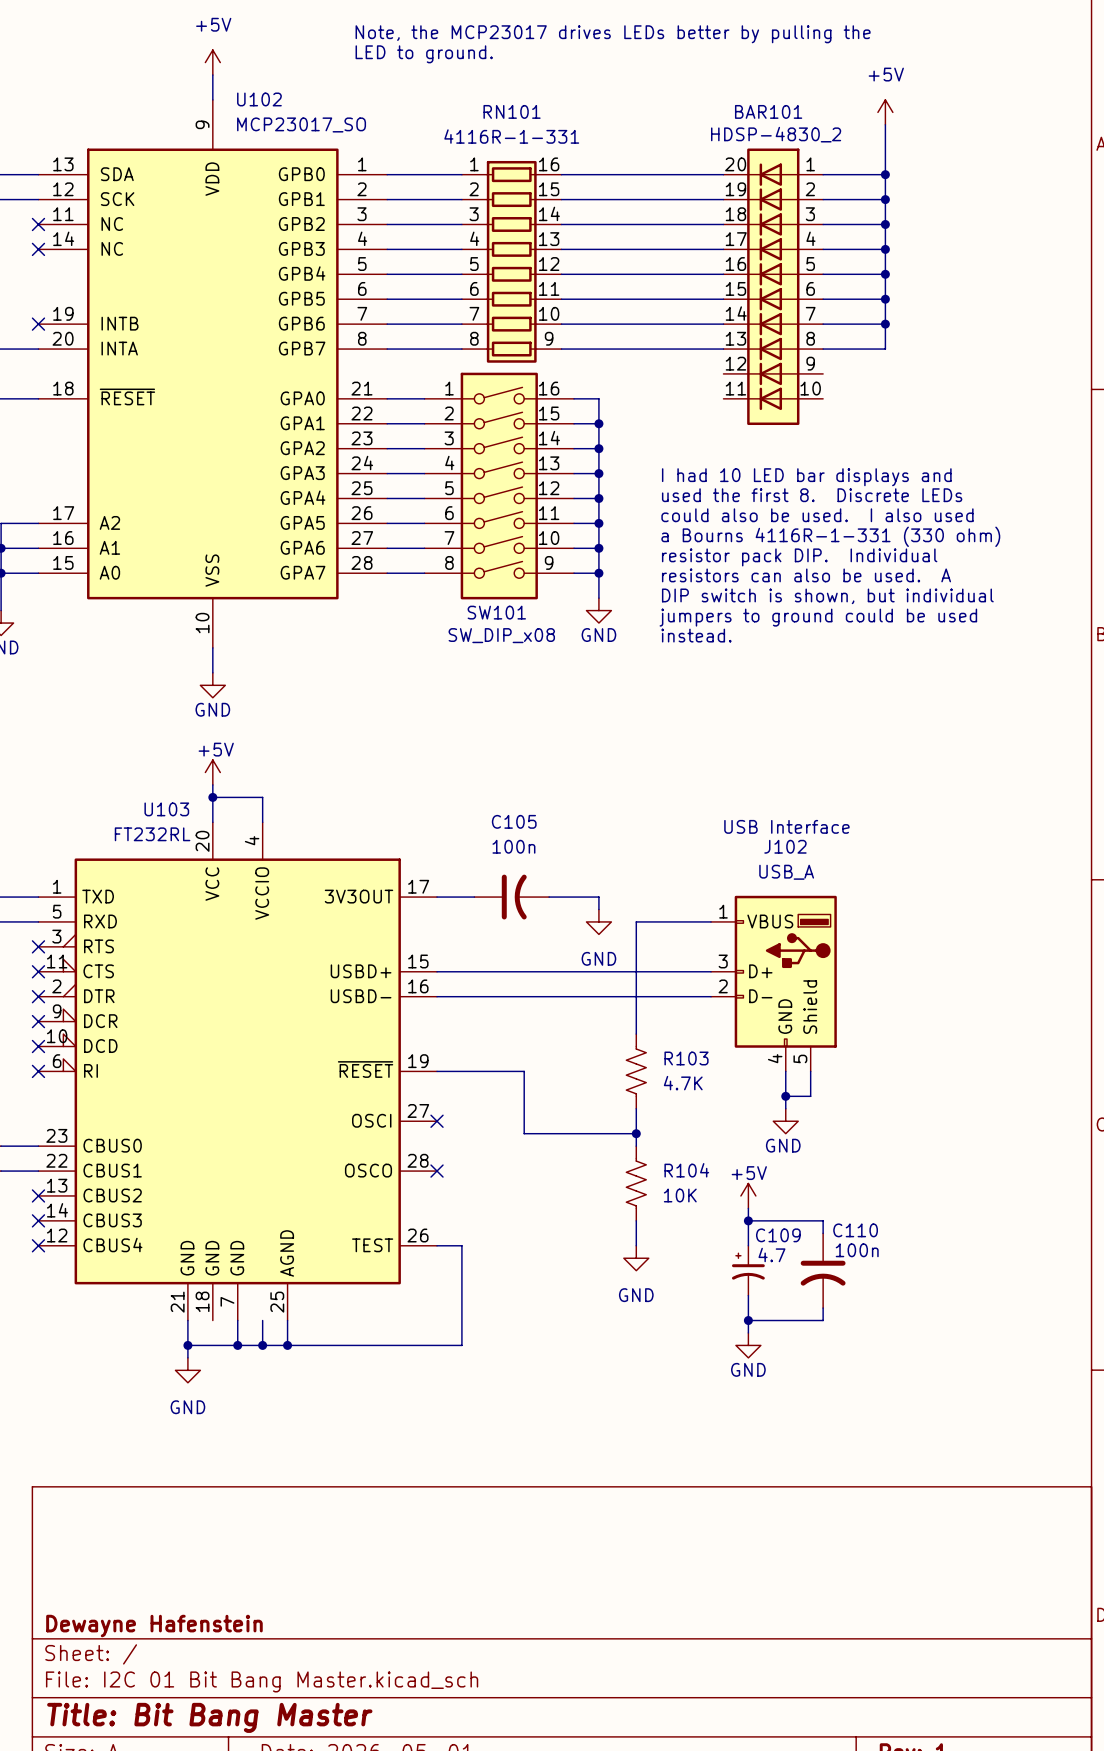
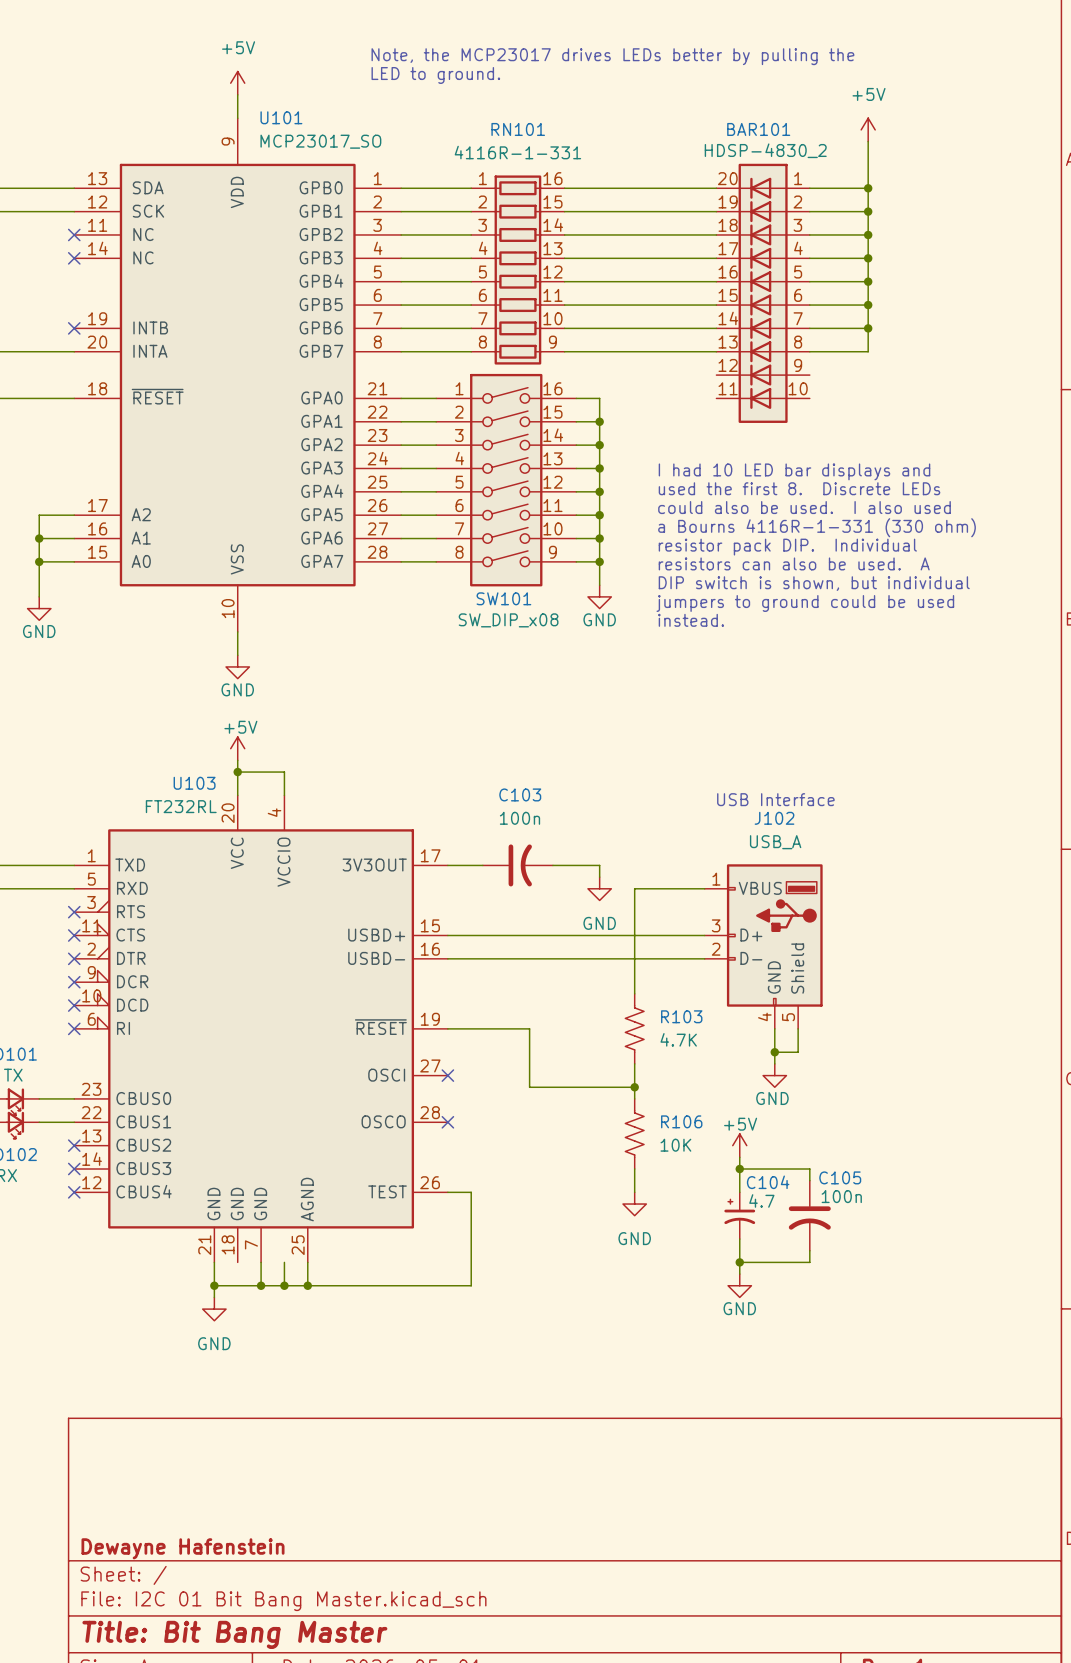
U102 name: U102 (259, 99) -> U101 (281, 117)
C105 name: C105 (514, 821) -> C103 (520, 794)
R104 name: R104 (686, 1170) -> R106 (681, 1121)
C110 name: C110 (855, 1230) -> C105 (840, 1177)
C109 name: C109 (778, 1235) -> C104 (768, 1182)

